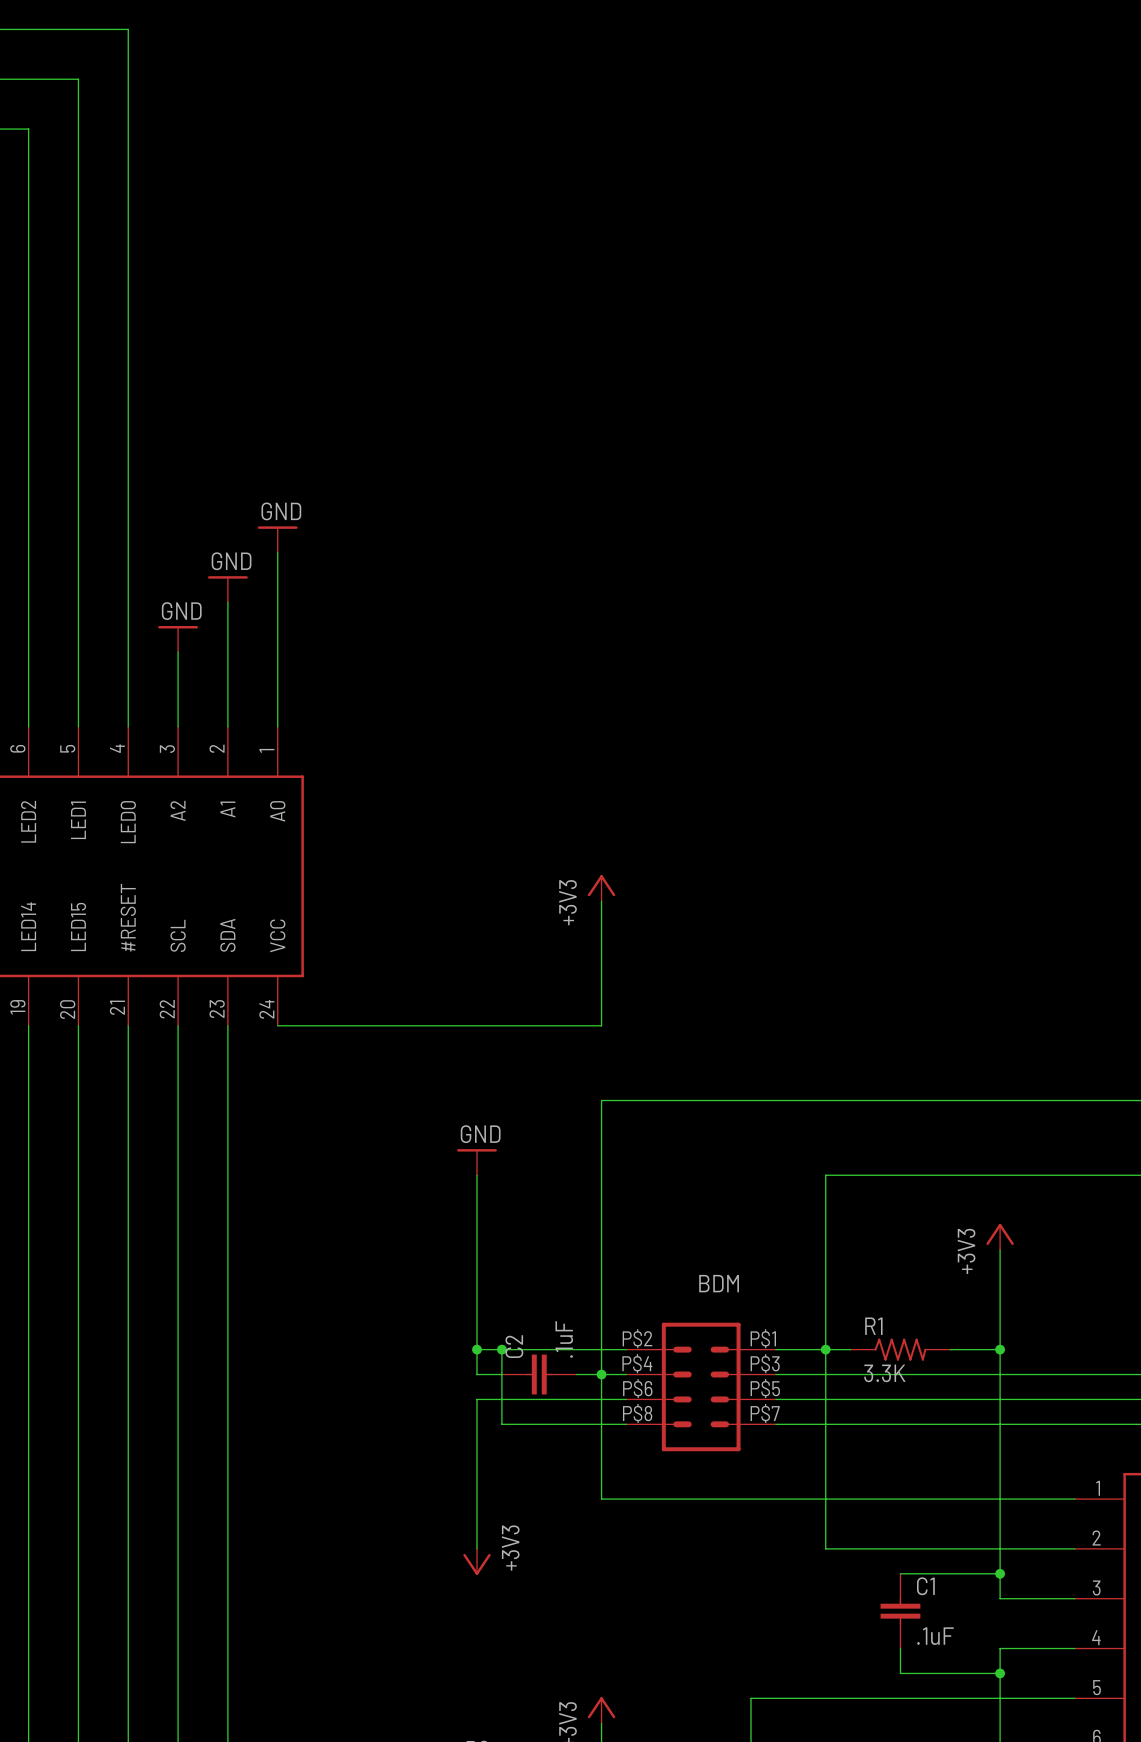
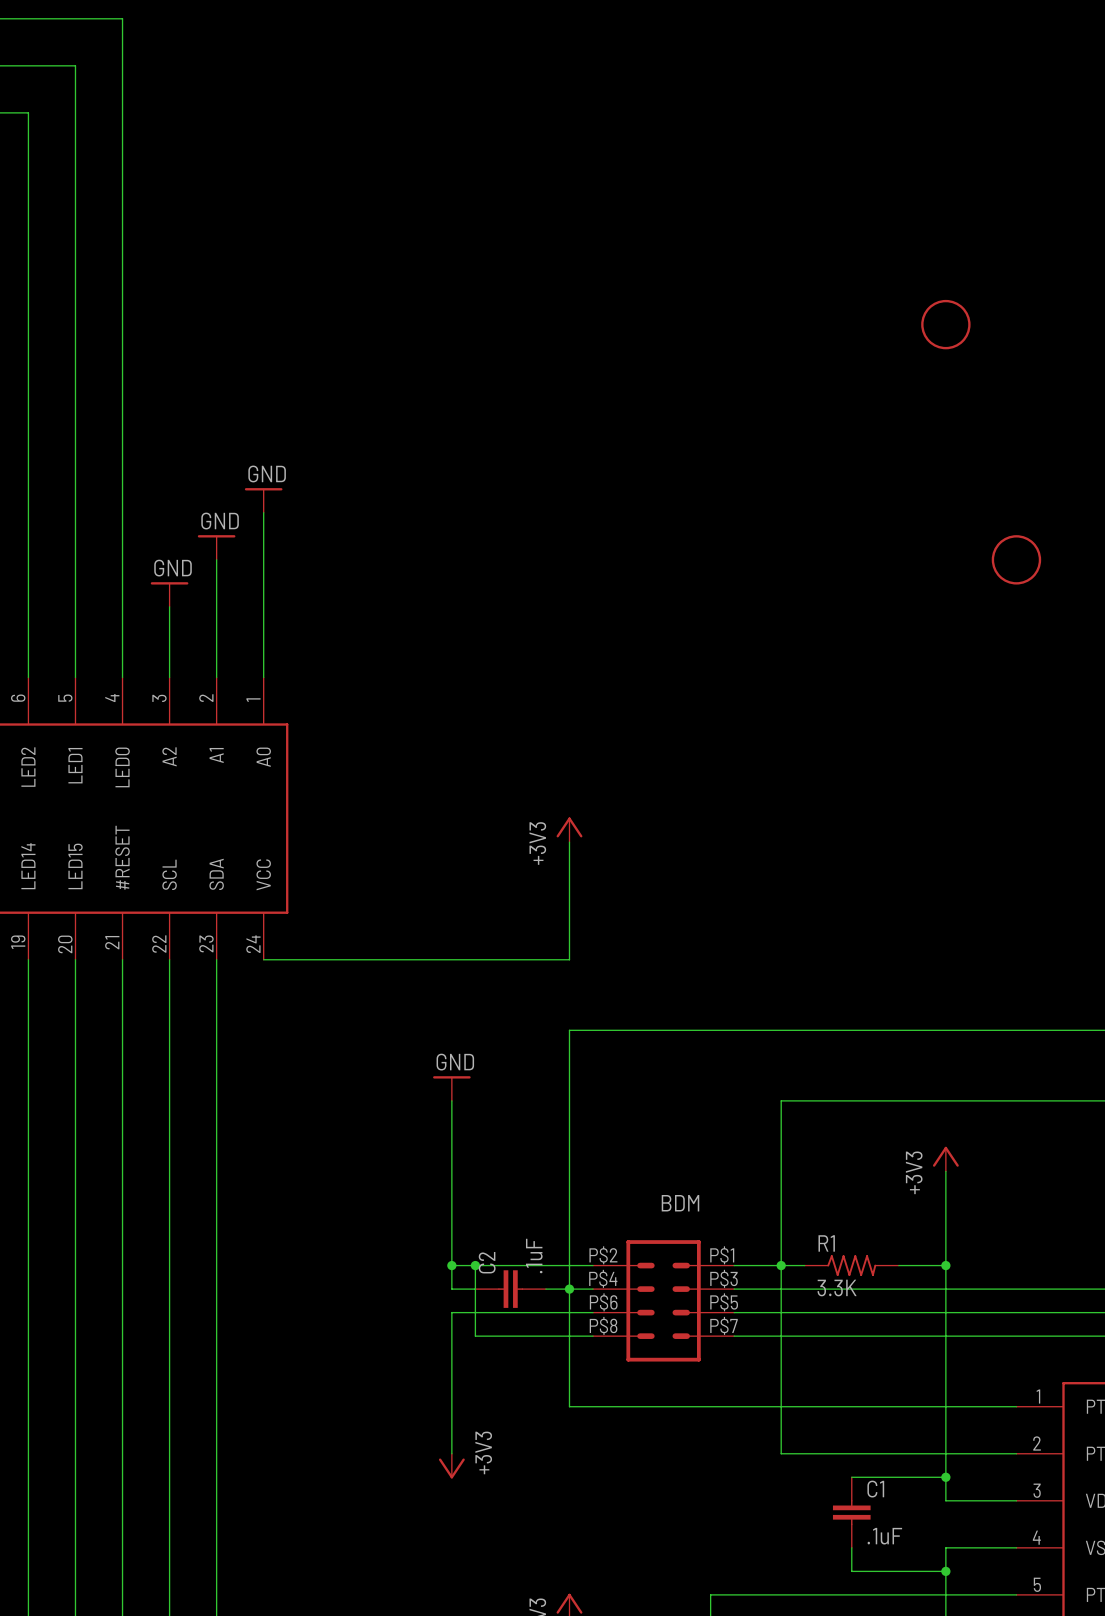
part: none -> (945, 324)
part: none -> (1016, 559)

